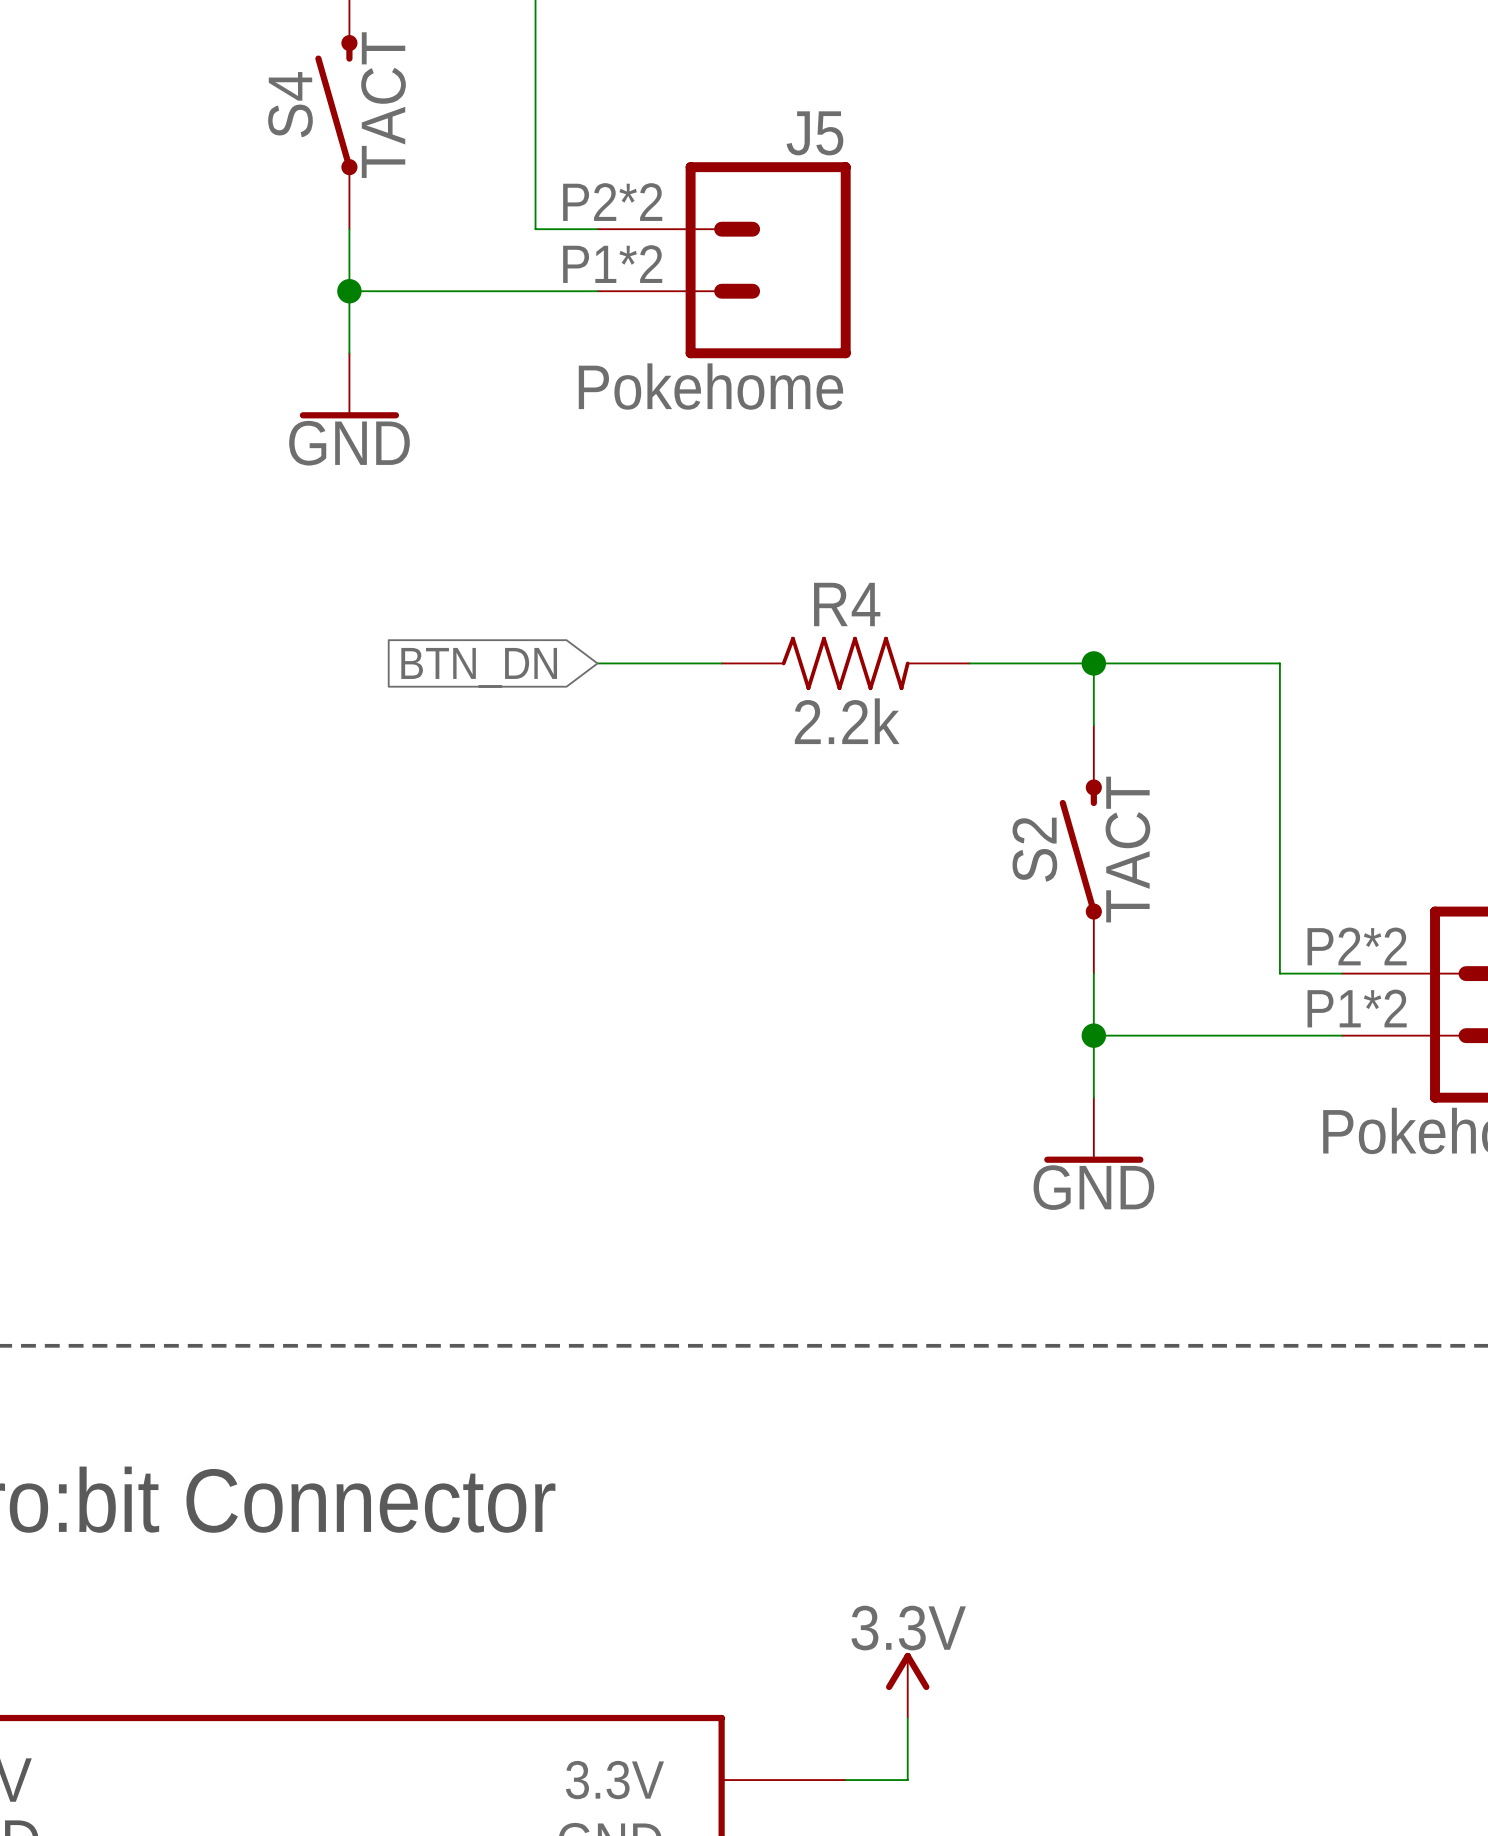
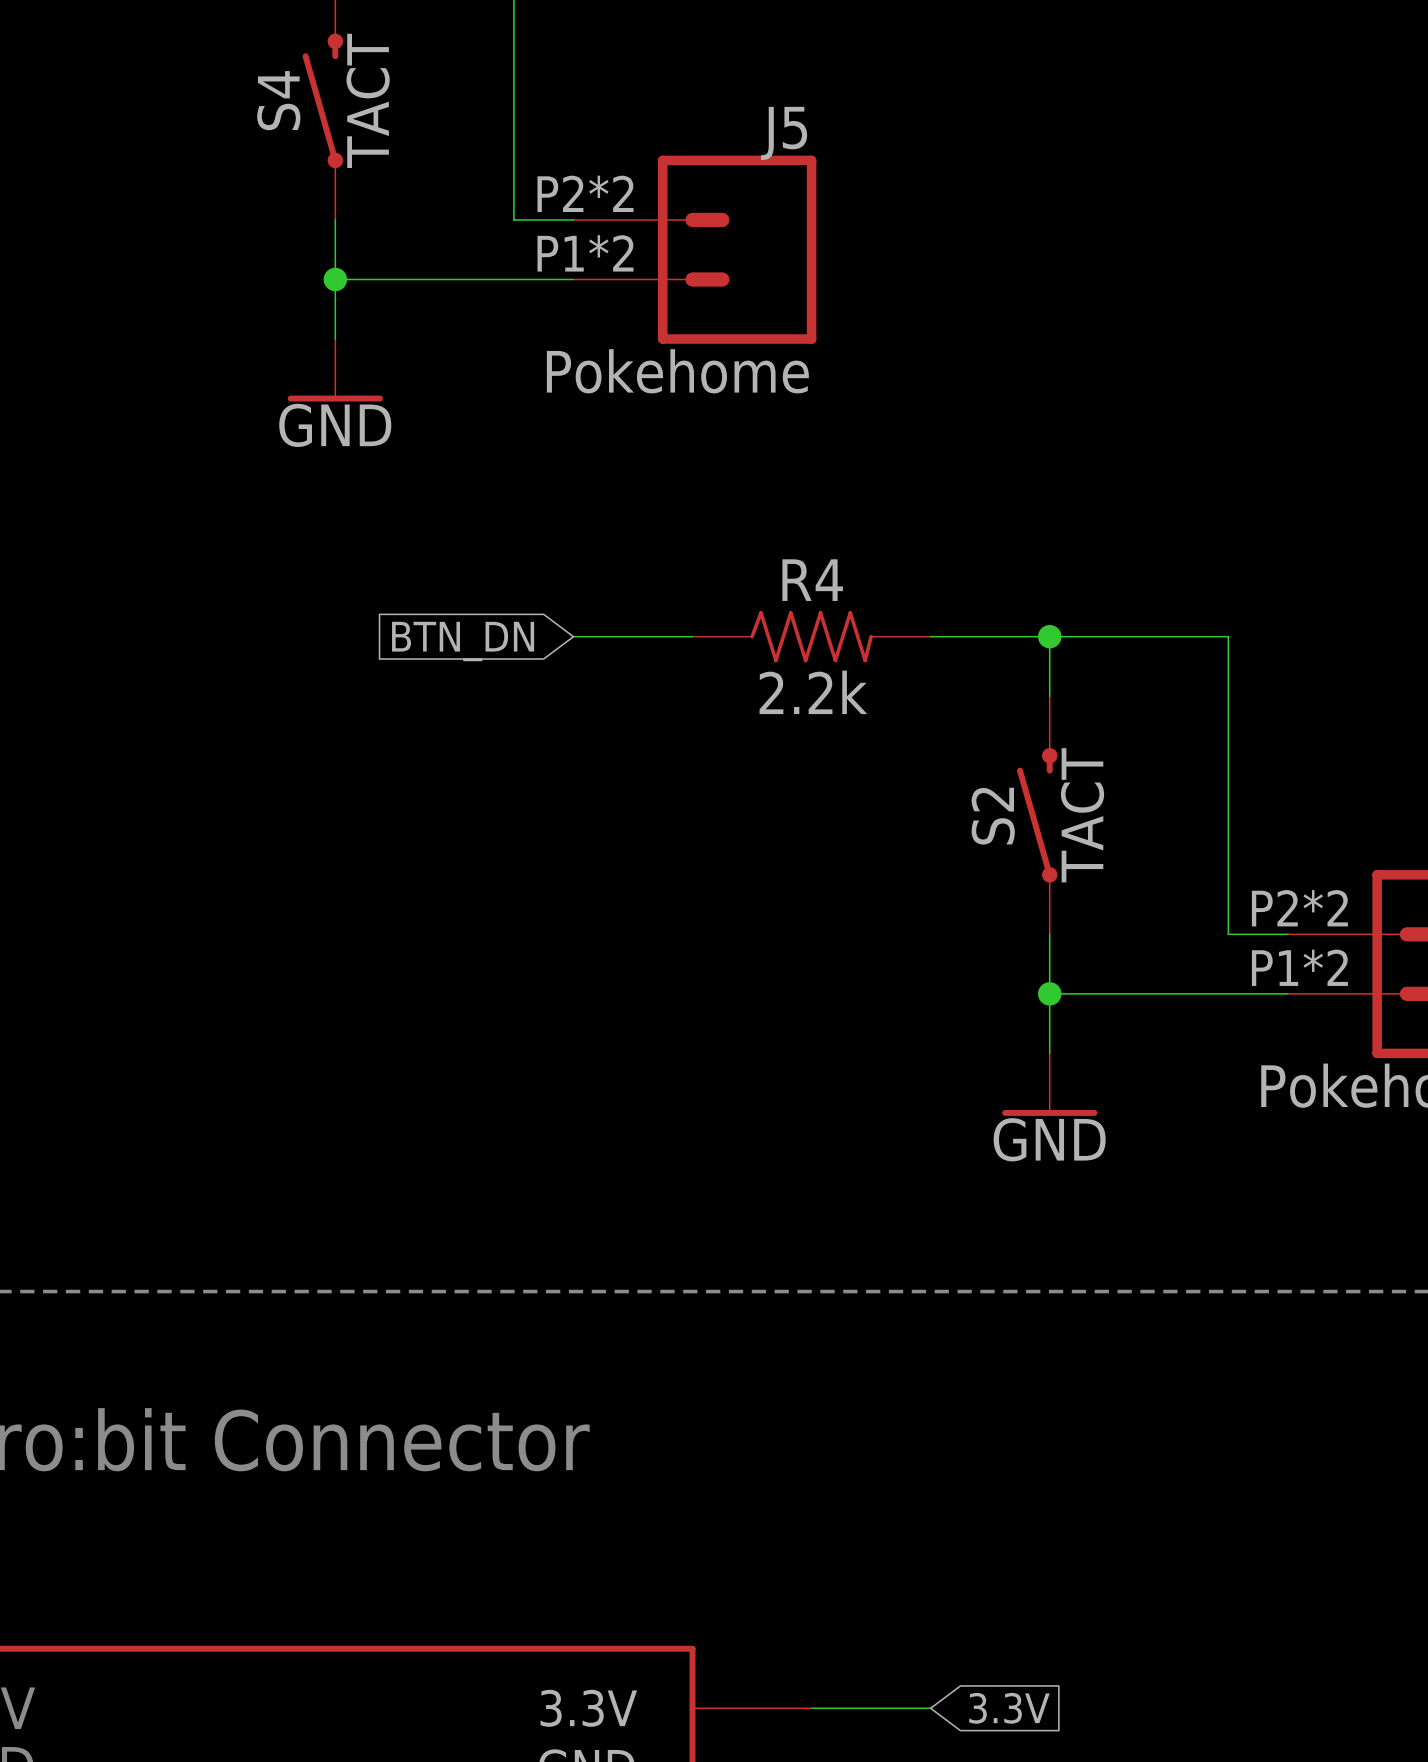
power symbol: 3.3V (907, 1685) -> none
wire: (907, 1718) (907, 1780) -> (930, 1708) (871, 1708)
global label: none -> 3.3V (1009, 1708)

